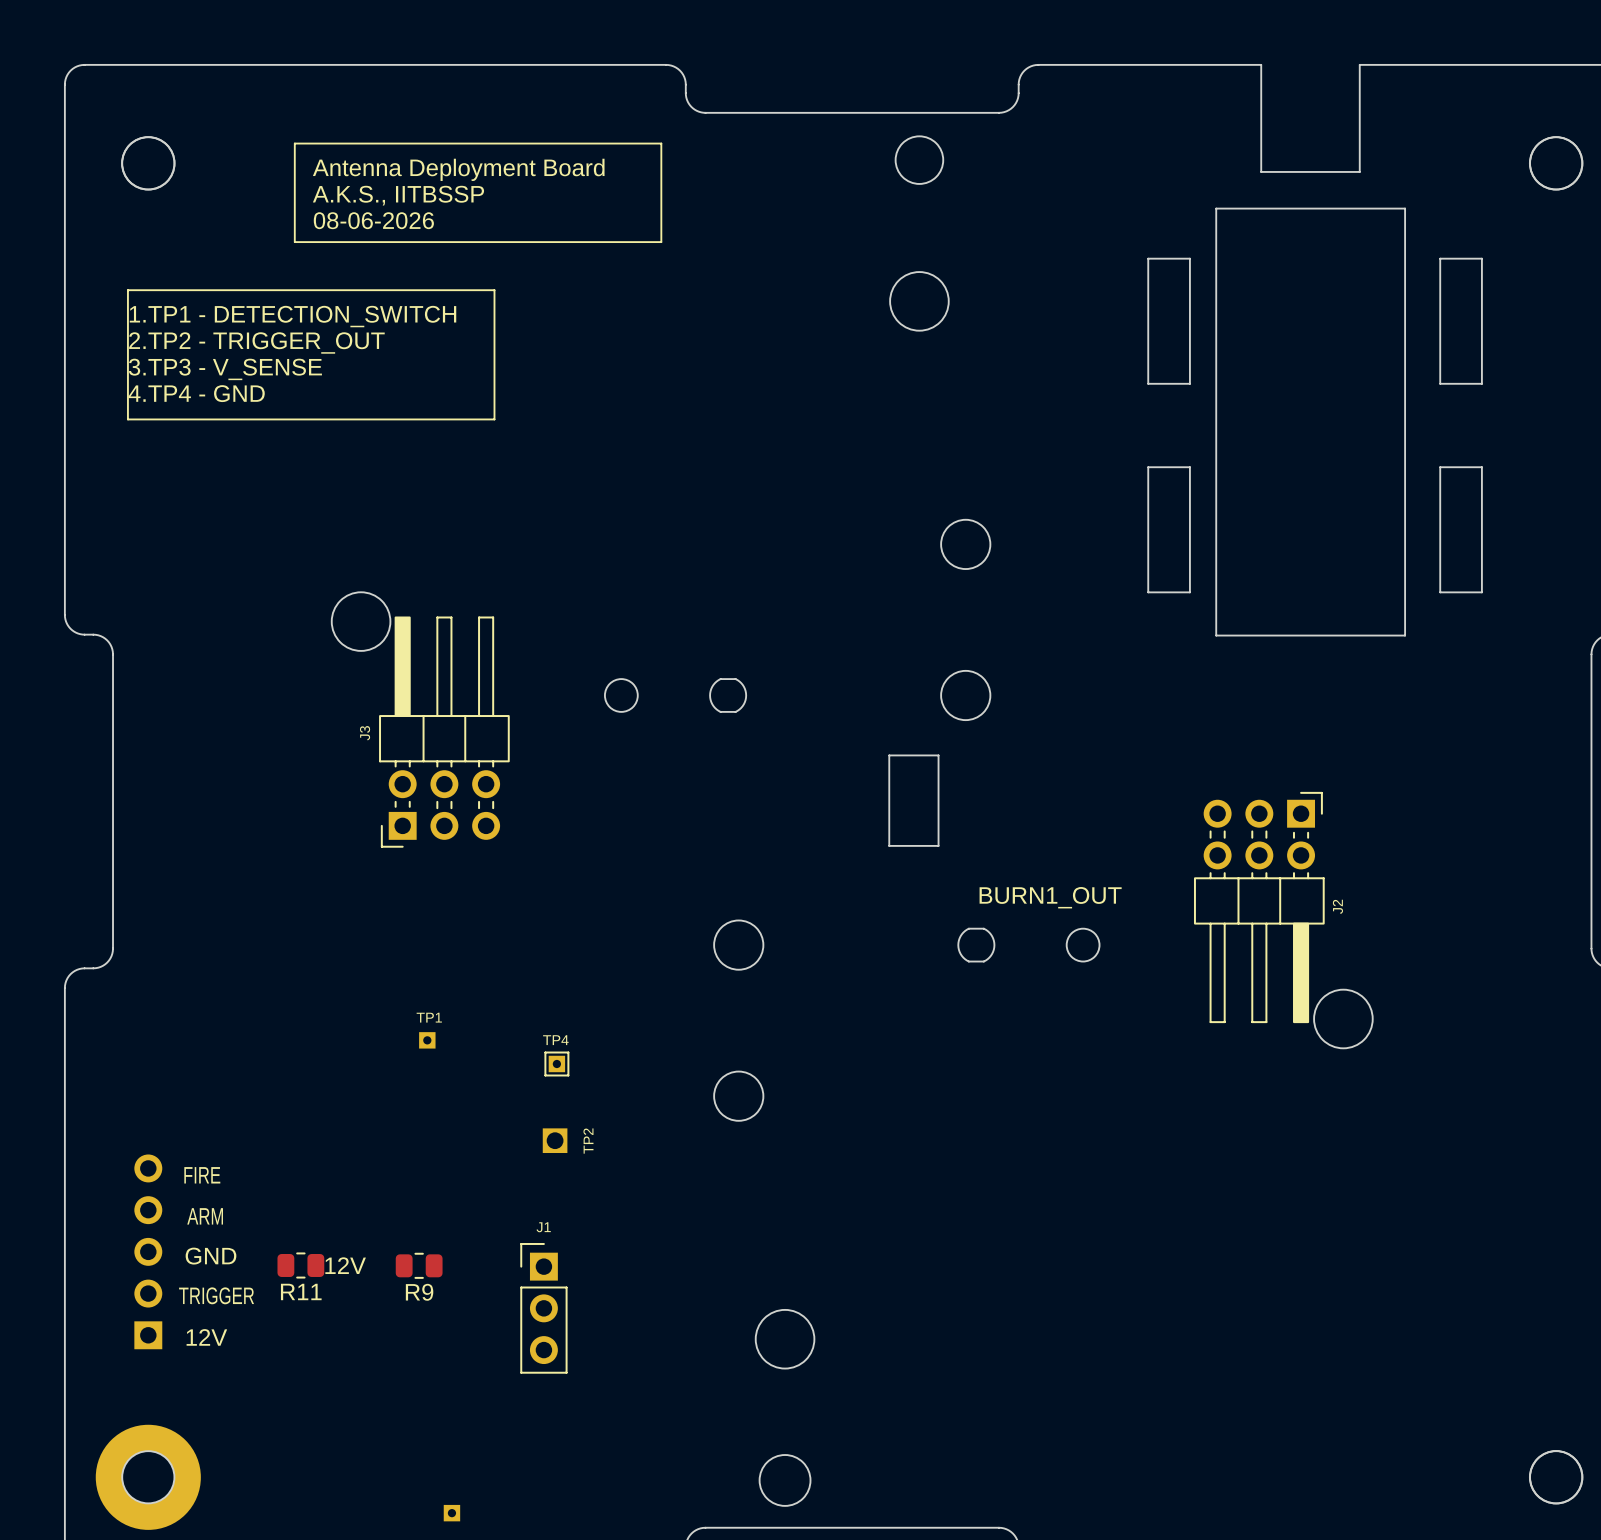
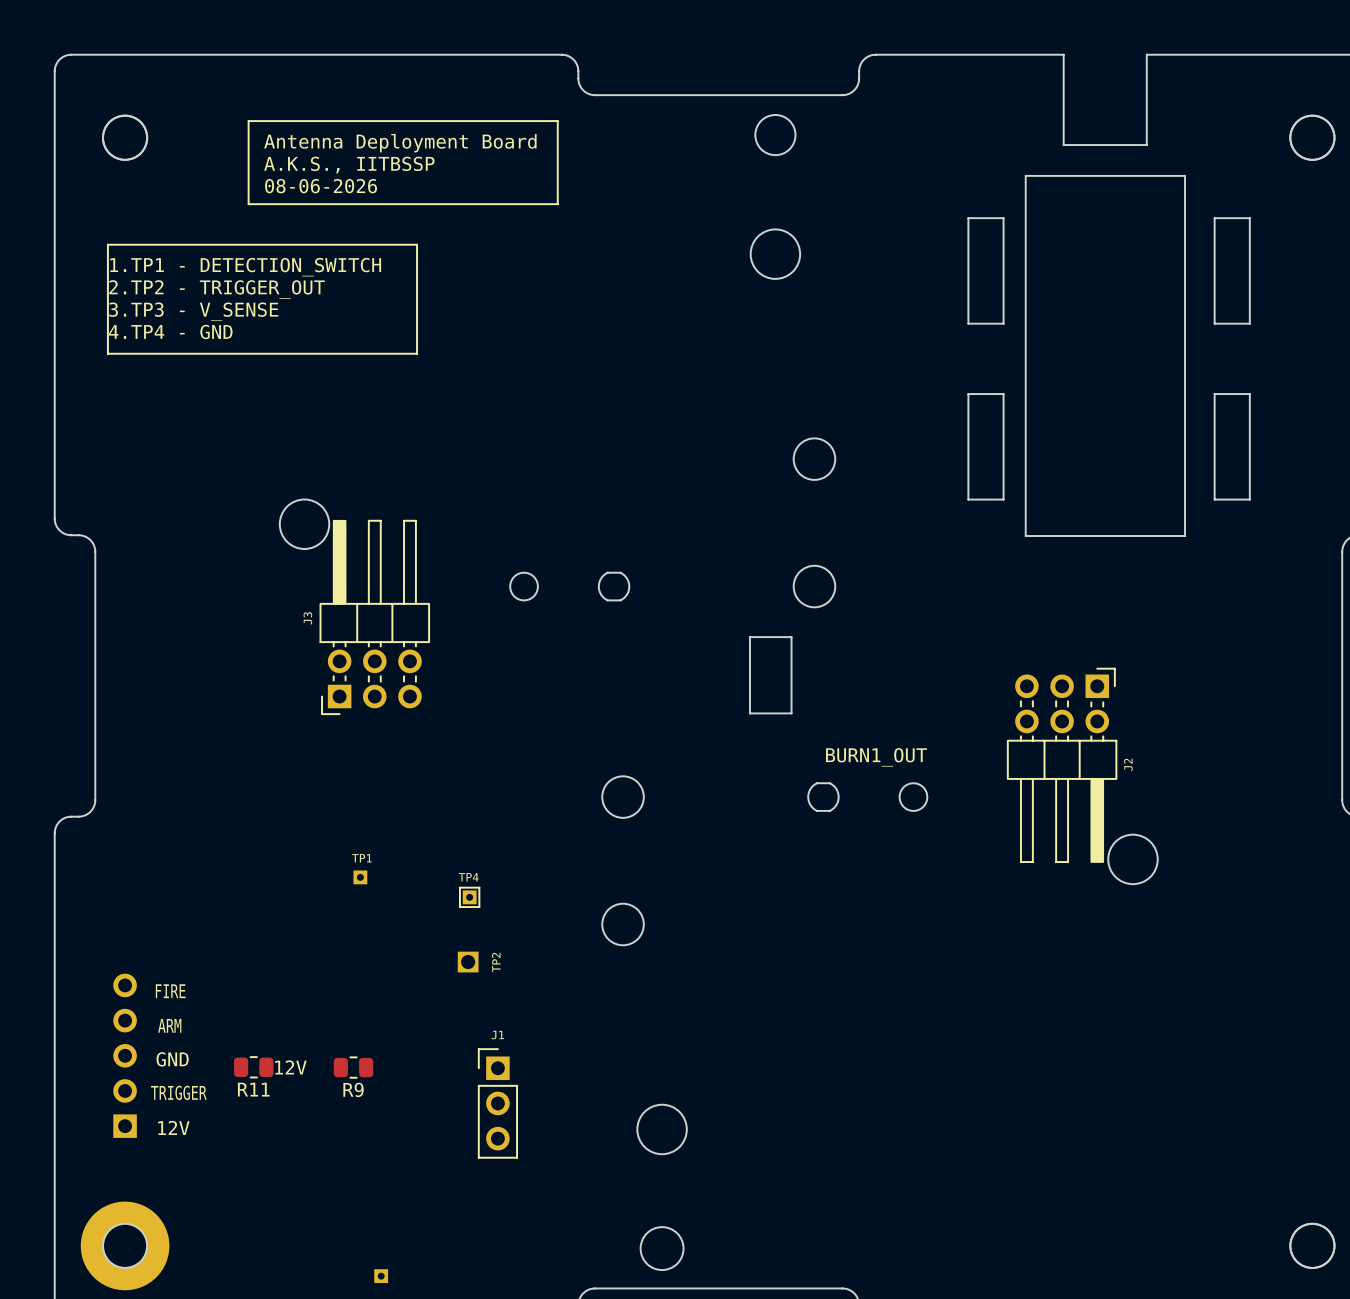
J1 position: (543, 1308) -> (497, 1103)

